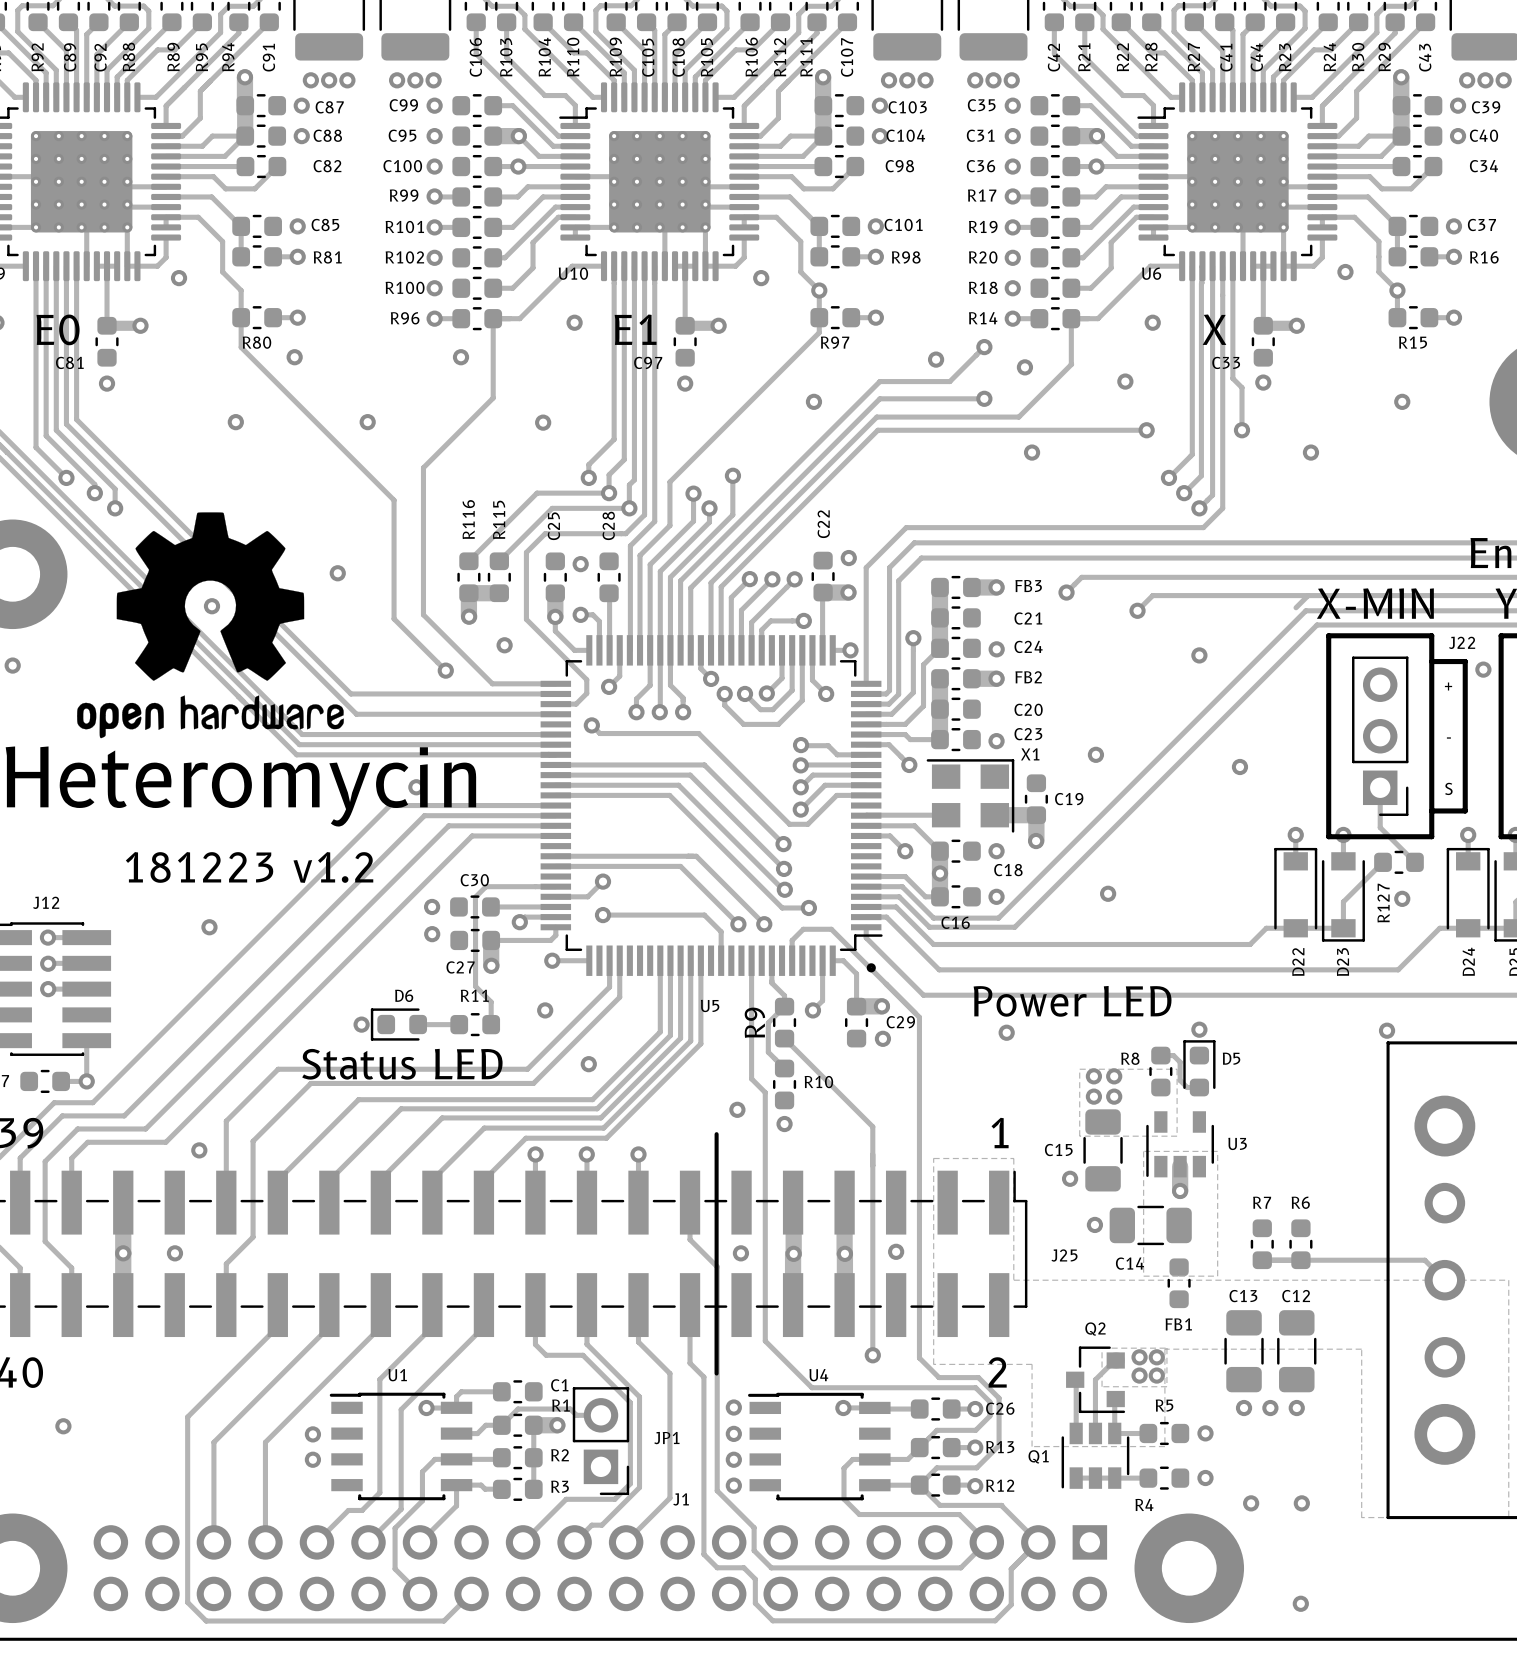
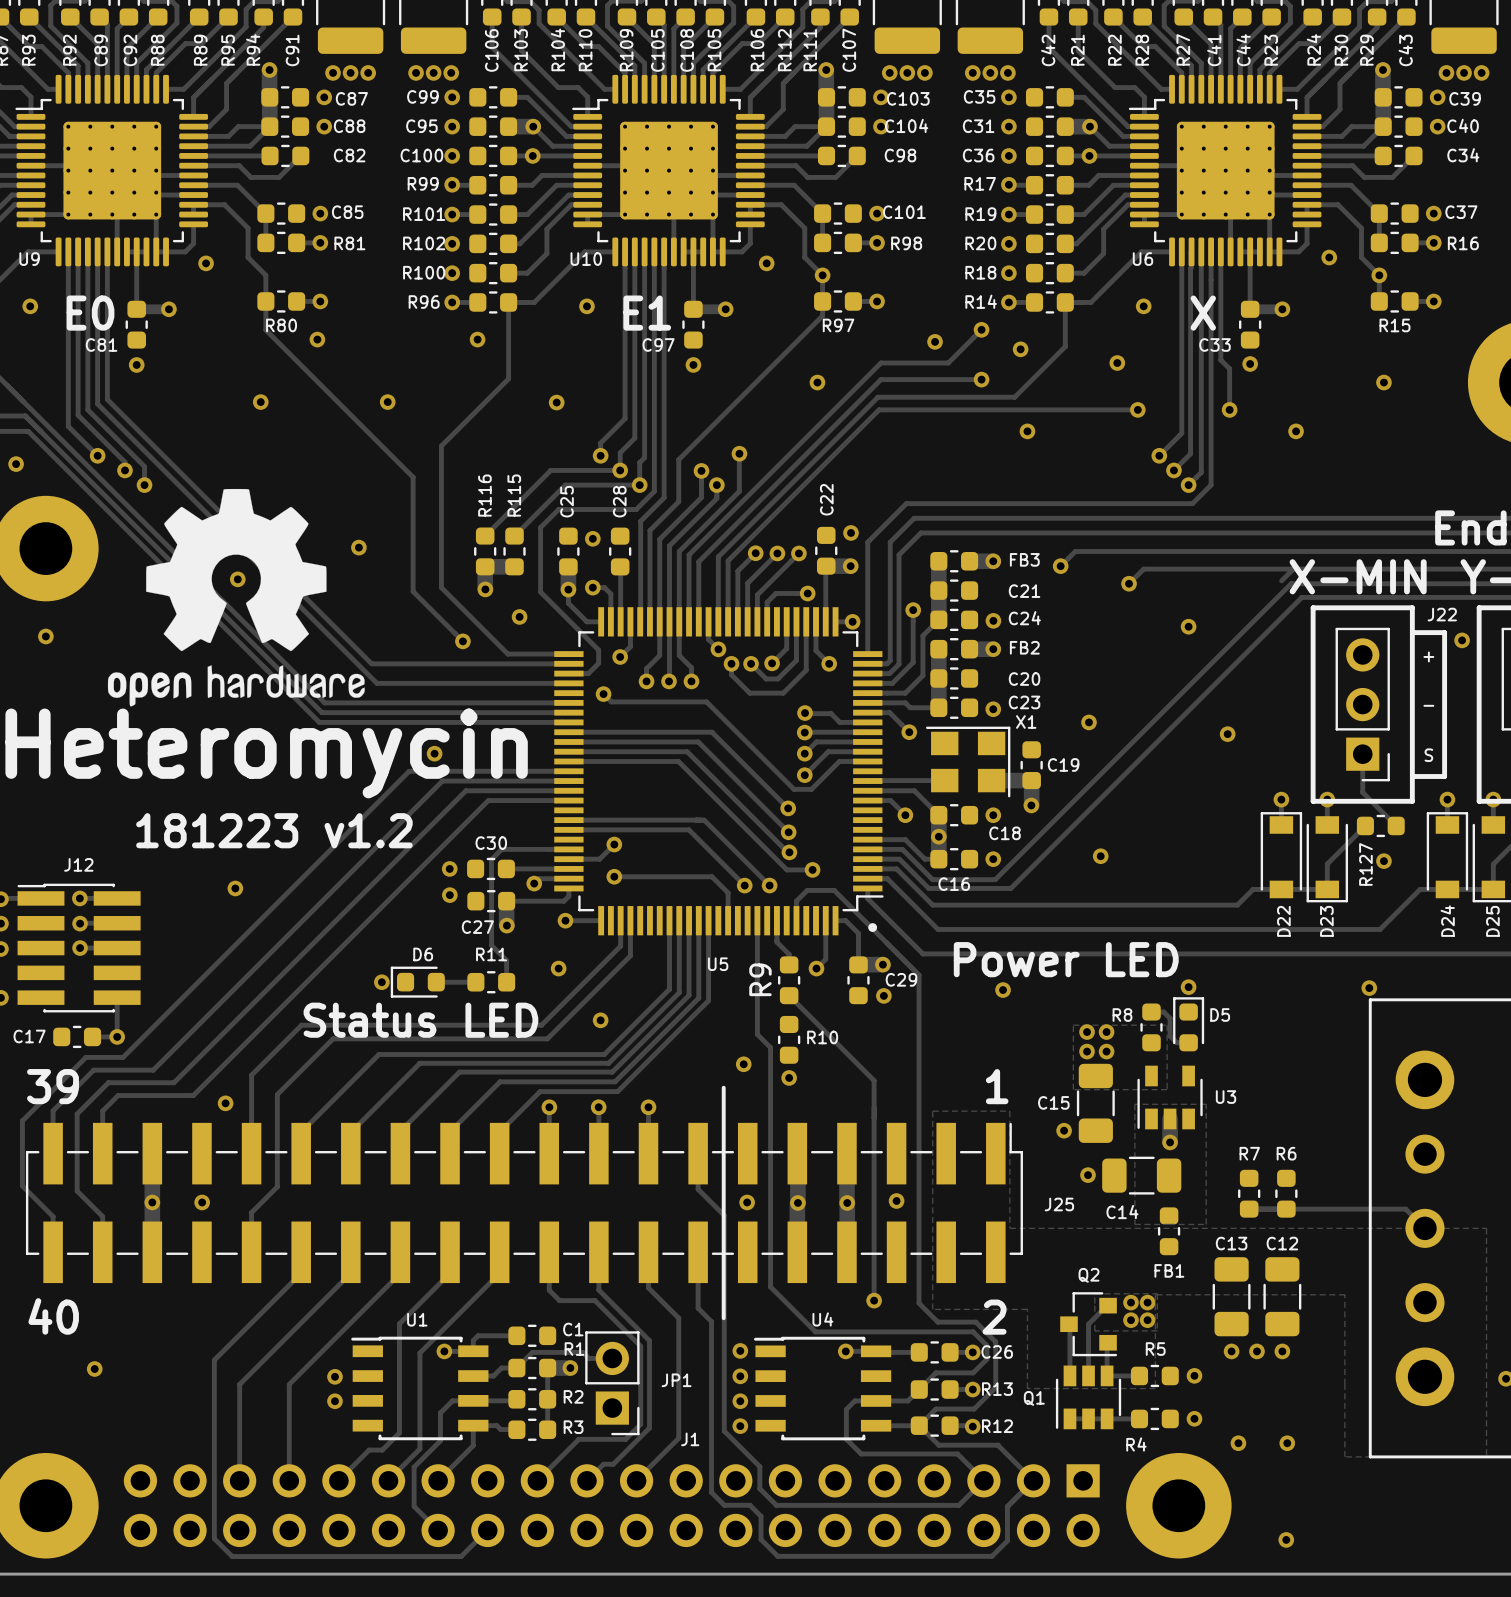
track: (784, 1006) (768, 1022) (768, 1052) (784, 1068) -> none

